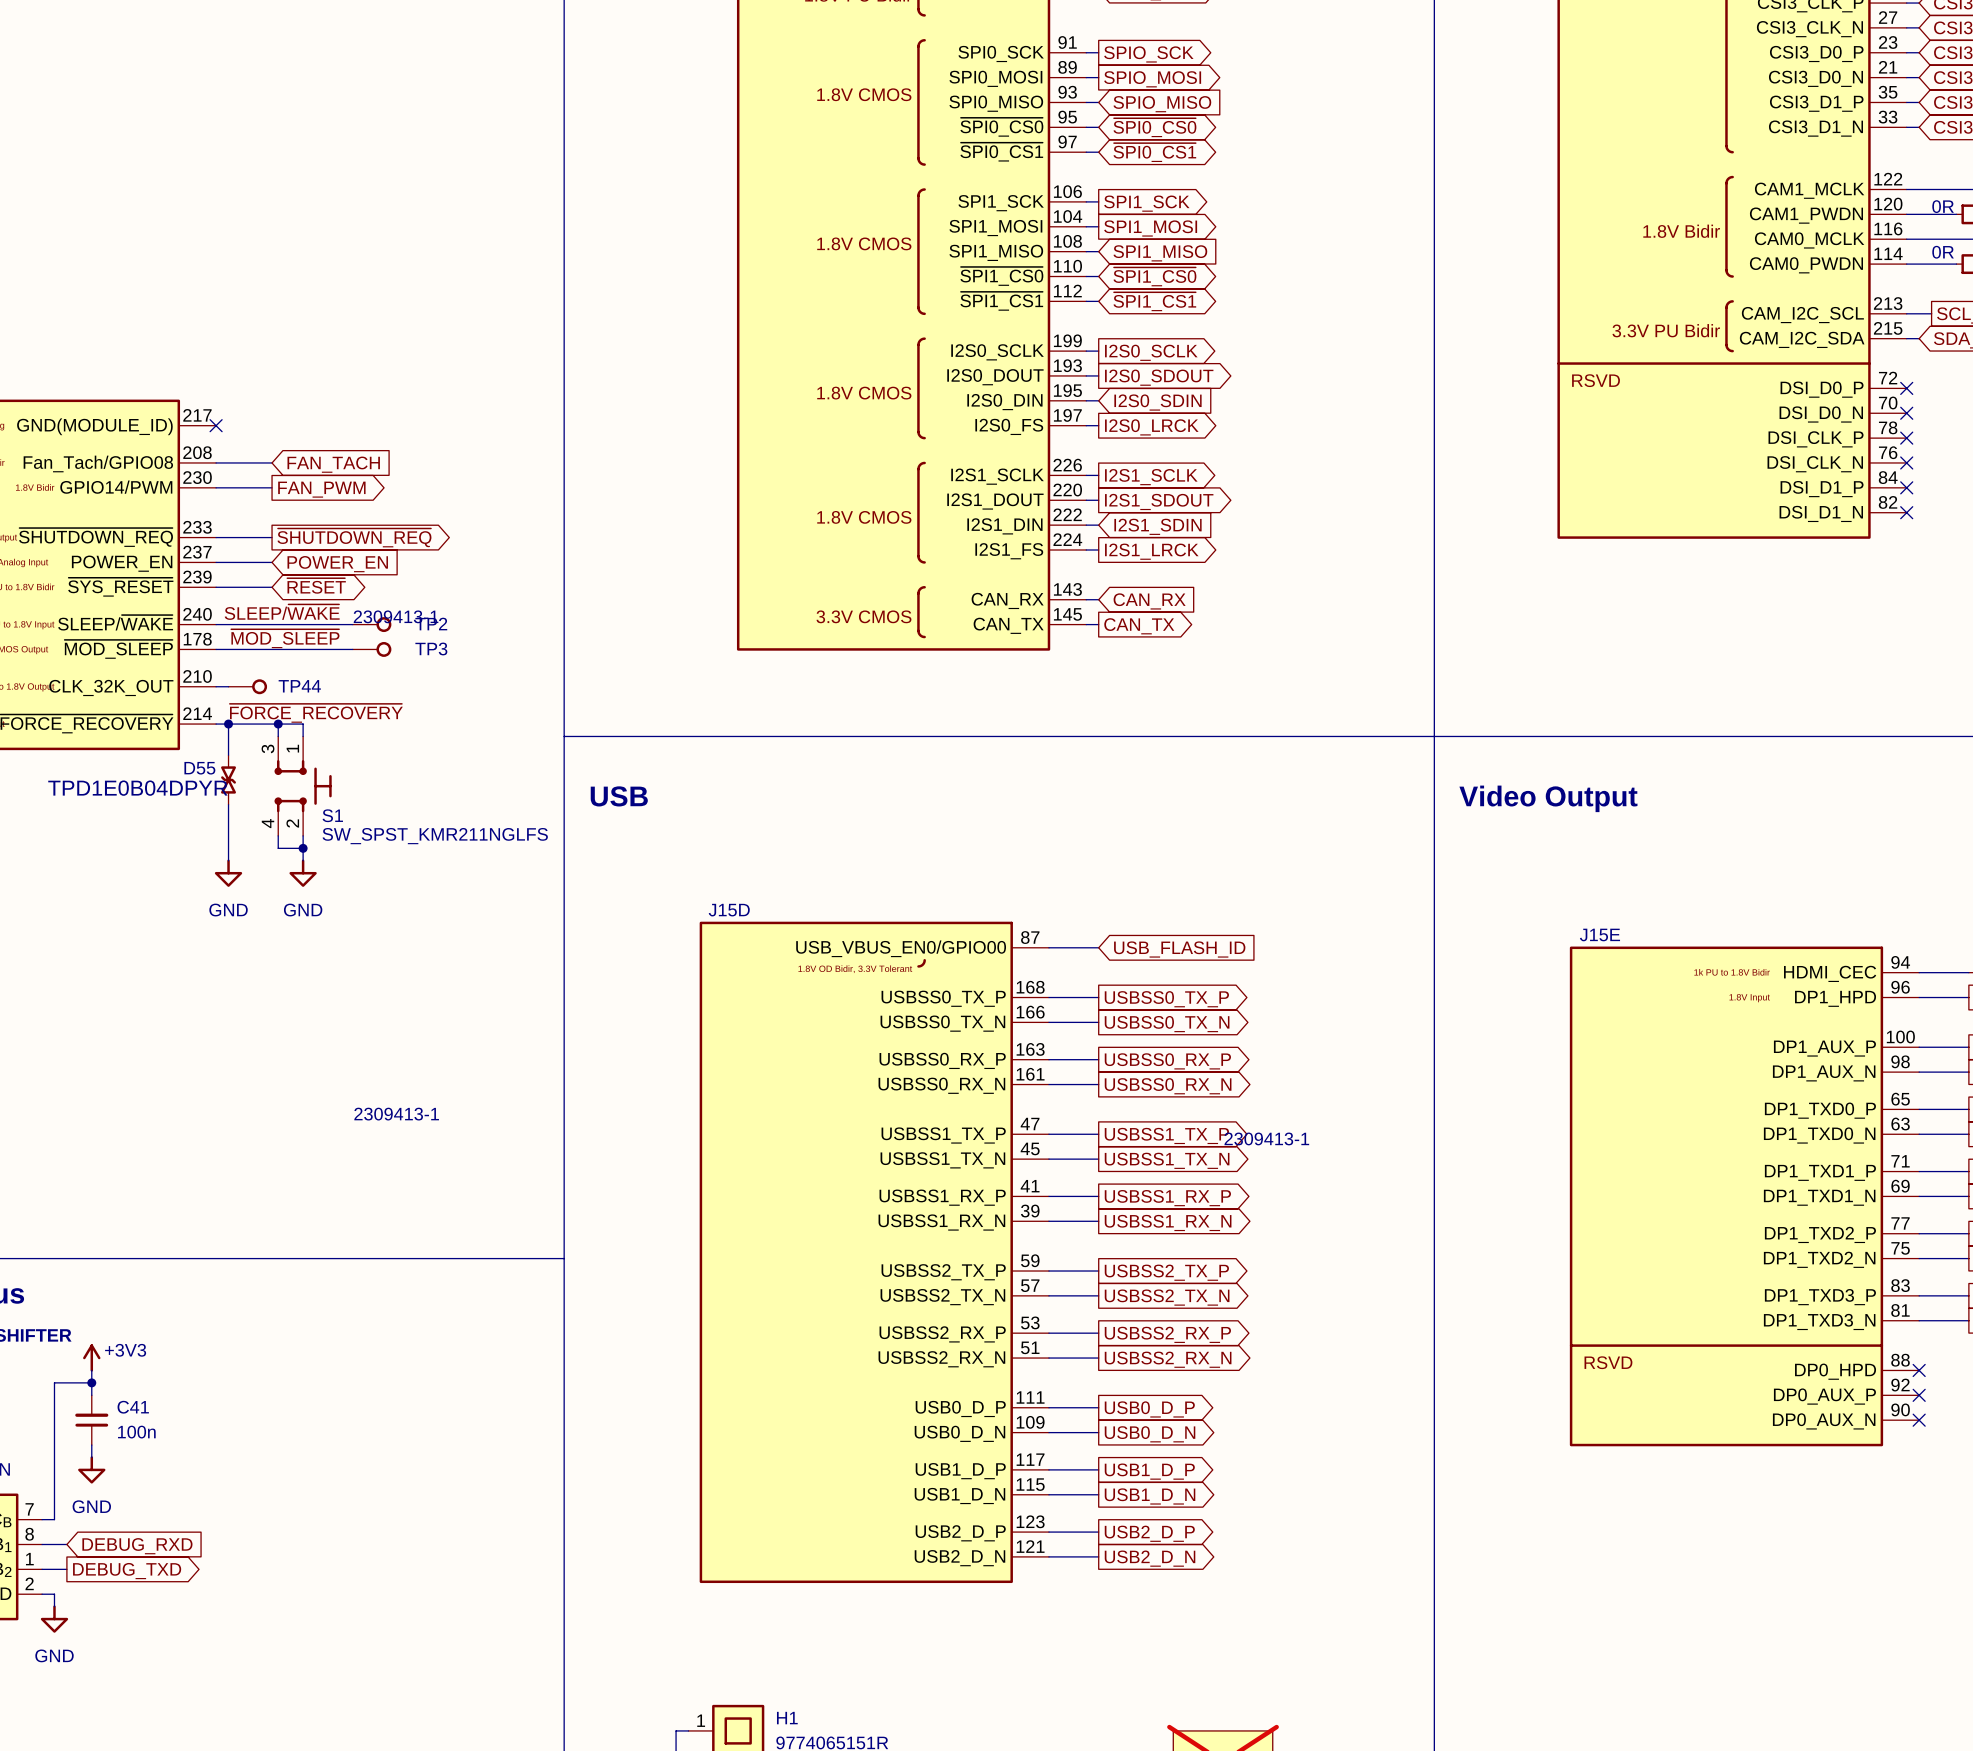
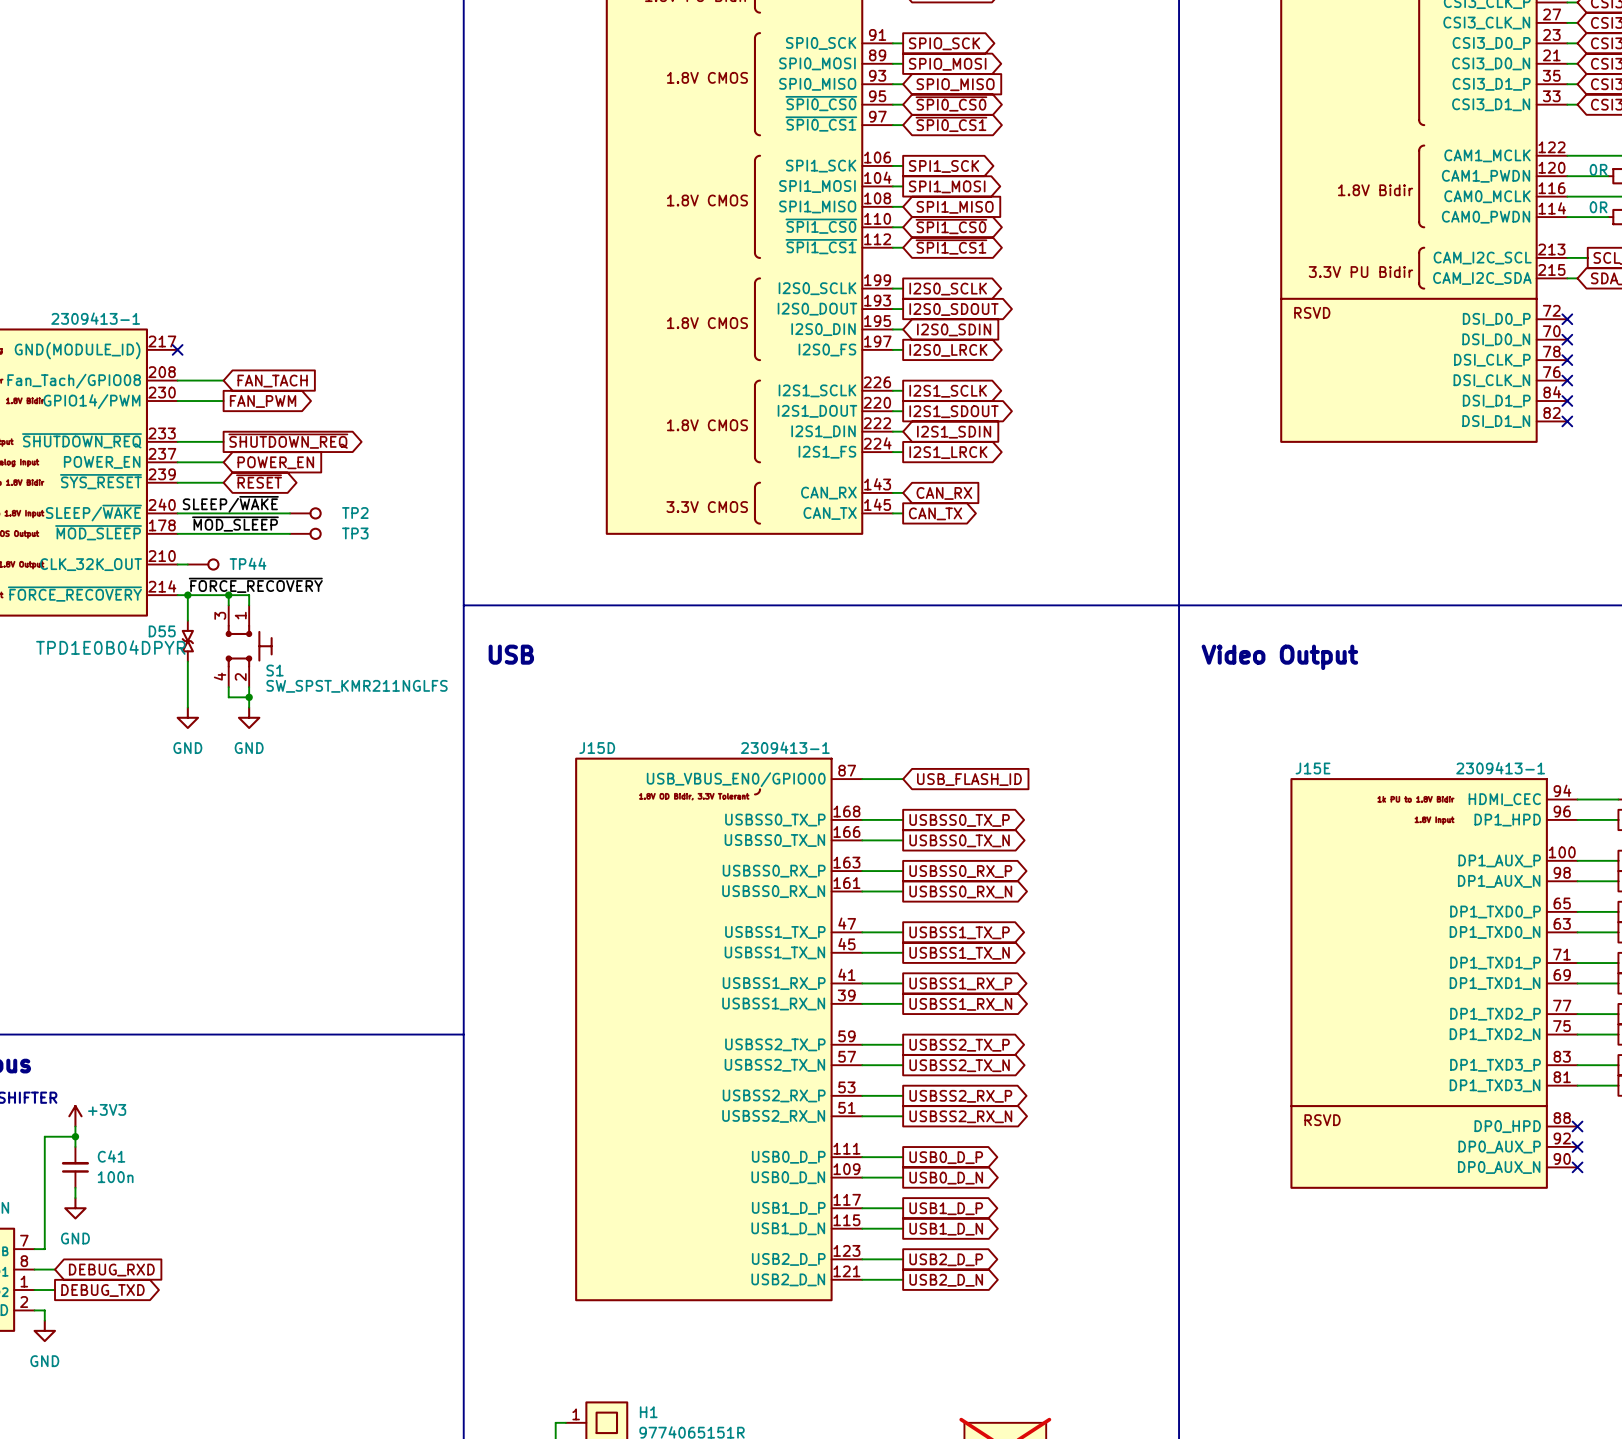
part text position: 2309413-1 (396, 616) -> 2309413-1 (95, 318)
J15D text position: 2309413-1 (396, 1114) -> 2309413-1 (785, 747)
J15E text position: 2309413-1 (1266, 1138) -> 2309413-1 (1500, 768)

